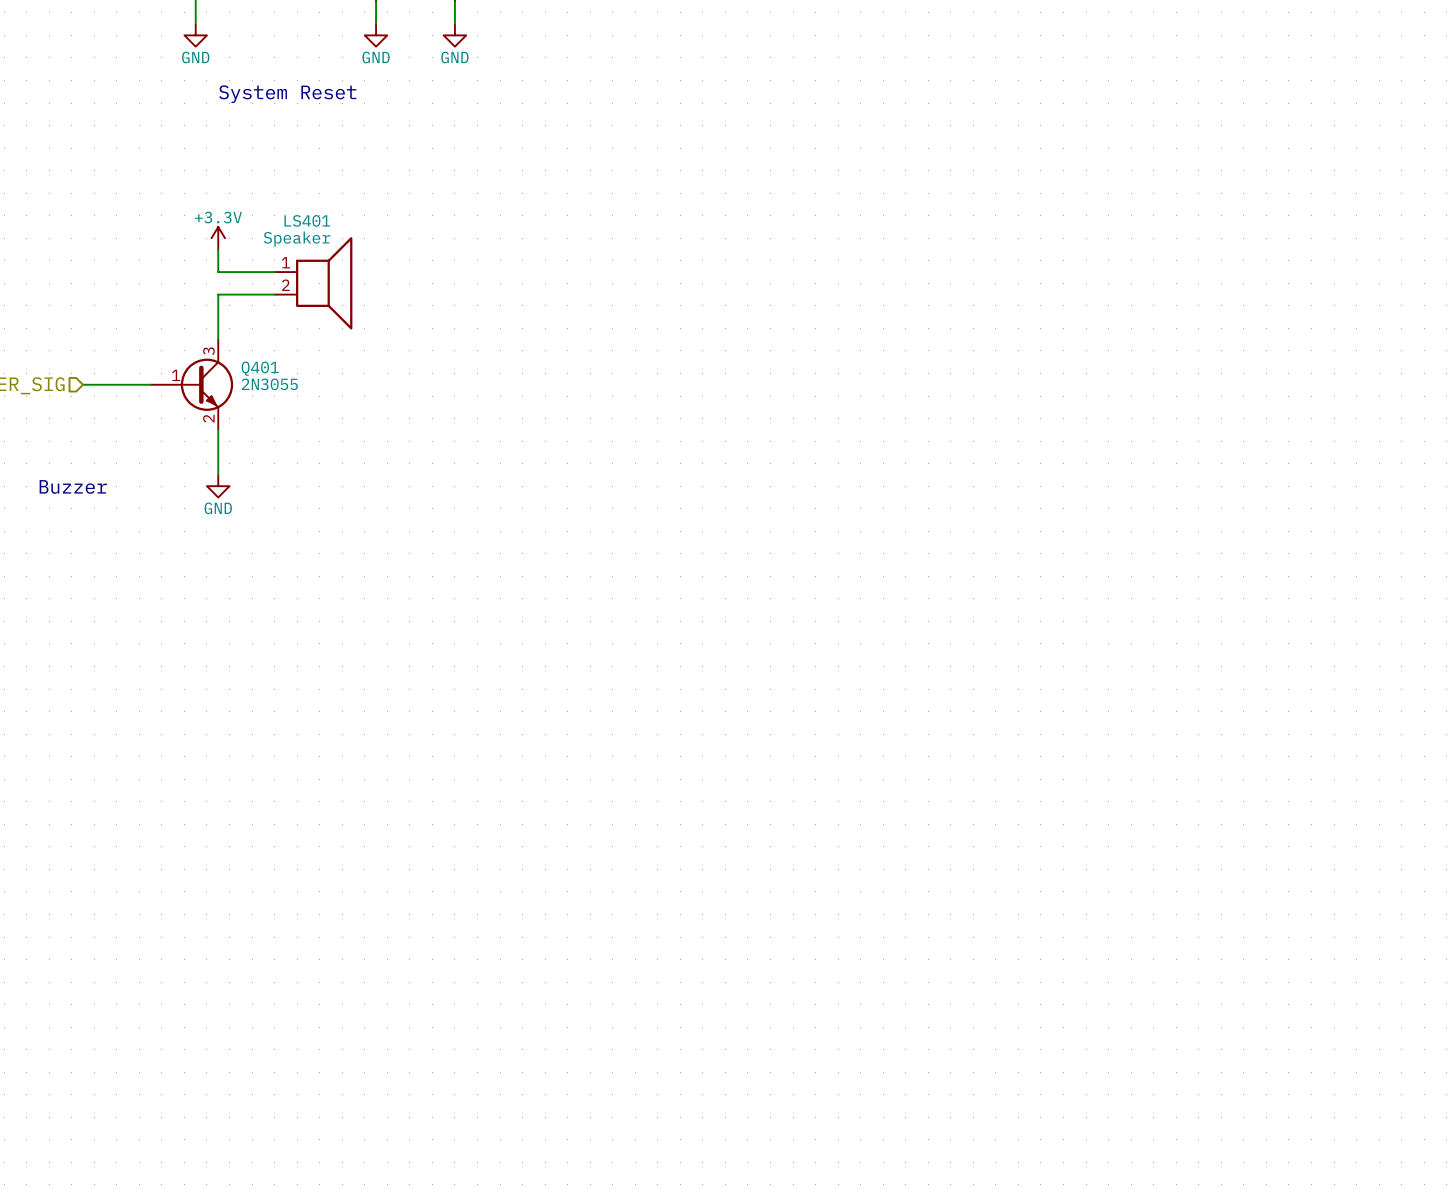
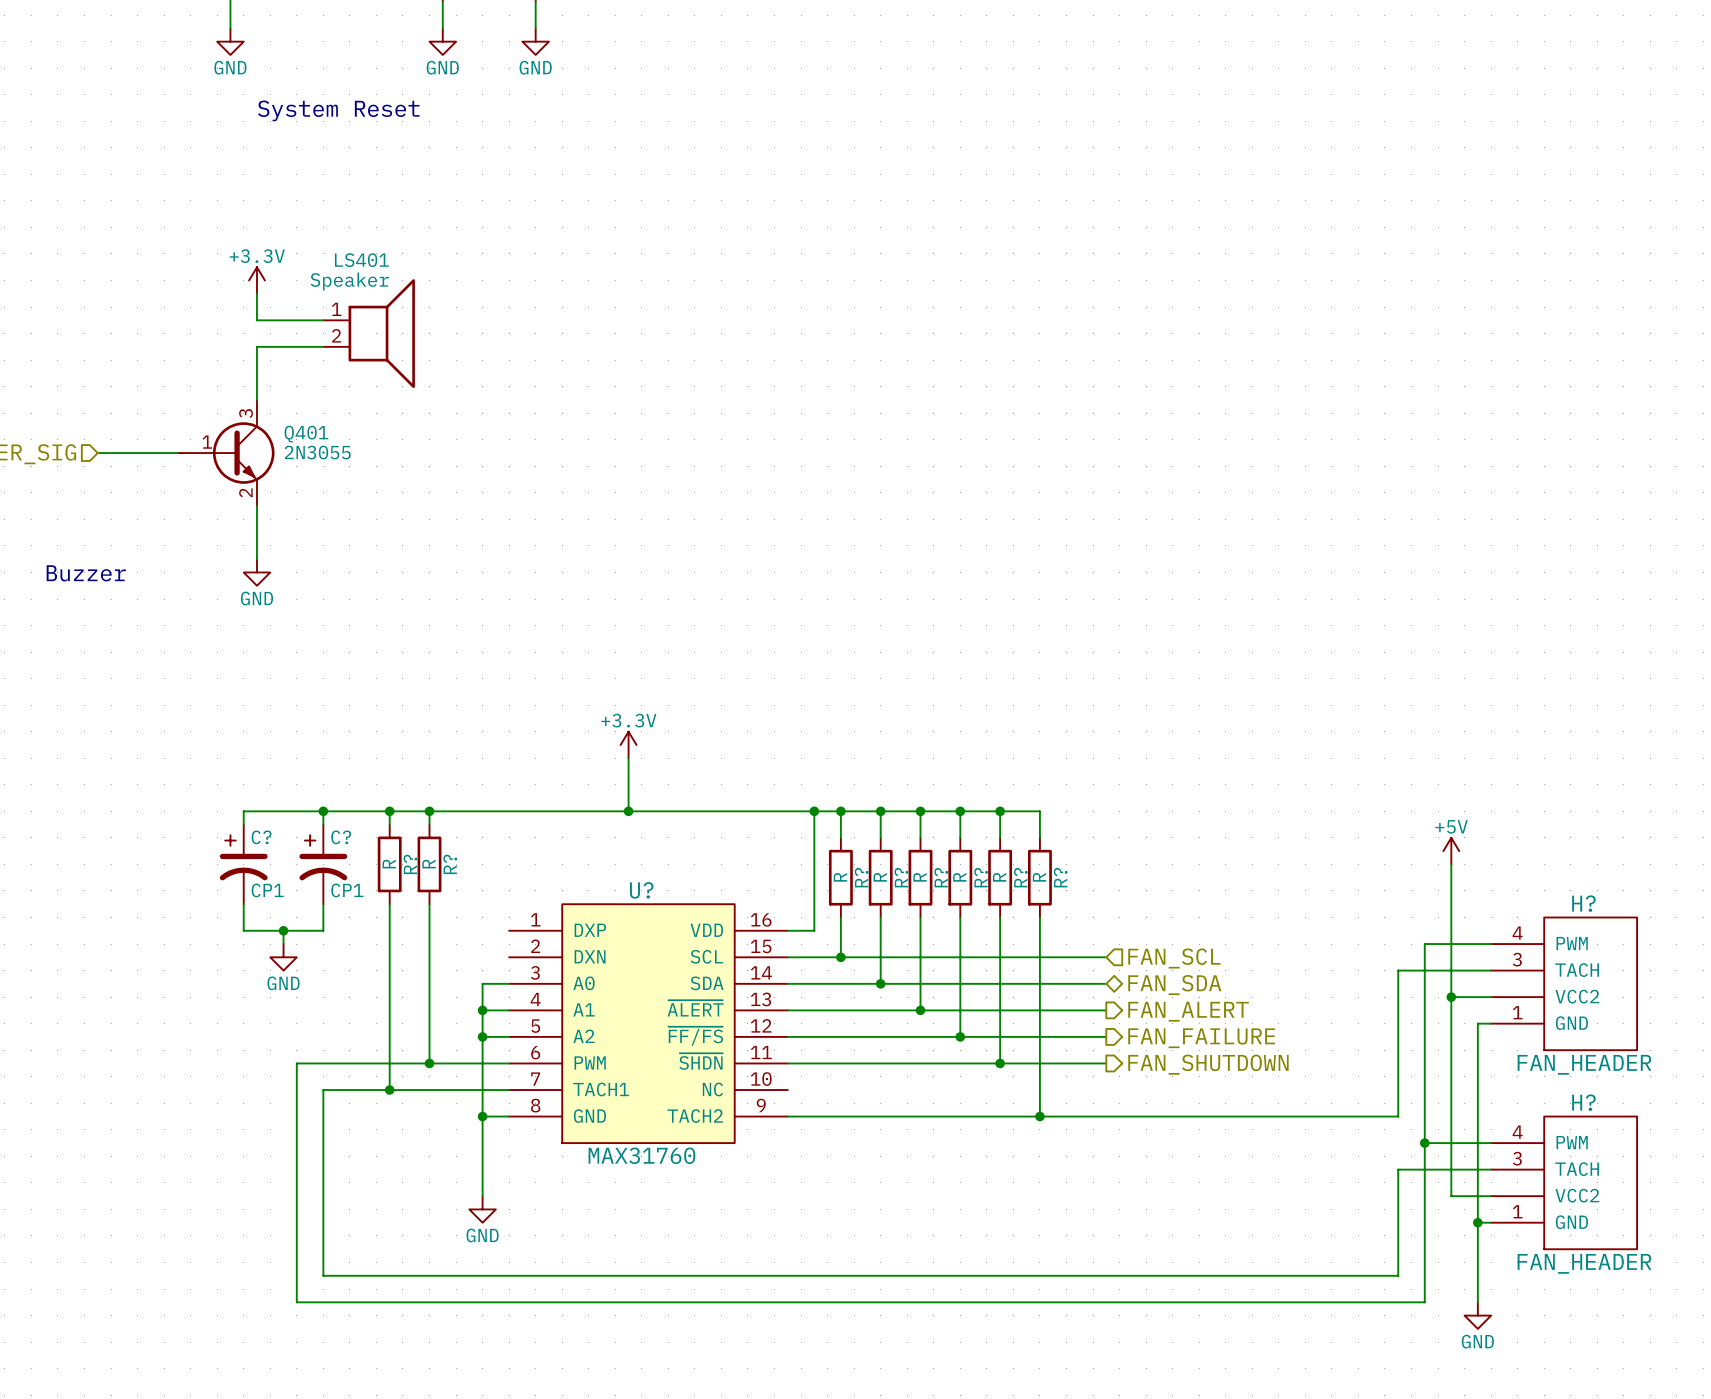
power symbol: none -> +3.3V (628, 744)
wire: none -> (628, 758) (628, 811)
wire: none -> (323, 811) (323, 824)
junction: none -> (323, 811)
wire: none -> (389, 811) (389, 824)
junction: none -> (389, 811)
wire: none -> (429, 811) (429, 824)
junction: none -> (429, 811)
junction: none -> (628, 811)
wire: none -> (814, 811) (814, 930) (787, 930)
junction: none -> (814, 811)
wire: none -> (840, 811) (840, 837)
junction: none -> (840, 811)
wire: none -> (880, 811) (880, 837)
junction: none -> (880, 811)
wire: none -> (920, 811) (920, 837)
junction: none -> (920, 811)
wire: none -> (960, 811) (960, 837)
junction: none -> (960, 811)
wire: none -> (1000, 811) (1000, 837)
junction: none -> (1000, 811)
wire: none -> (243, 824) (243, 811) (1039, 811) (1039, 837)
power symbol: none -> +5V (1451, 851)
C?: none -> CP1 (243, 864)
C?: none -> CP1 (323, 864)
R?: none -> R (389, 864)
R?: none -> R (429, 864)
wire: none -> (1451, 864) (1451, 1196) (1491, 1196)
R?: none -> R (840, 877)
R?: none -> R (880, 877)
R?: none -> R (920, 877)
R?: none -> R (960, 877)
R?: none -> R (1000, 877)
R?: none -> R (1039, 877)
wire: none -> (243, 904) (243, 930) (323, 930) (323, 904)
wire: none -> (389, 904) (389, 1090)
wire: none -> (429, 904) (429, 1063)
wire: none -> (840, 917) (840, 957)
wire: none -> (880, 917) (880, 983)
wire: none -> (920, 917) (920, 1010)
wire: none -> (960, 917) (960, 1036)
wire: none -> (1000, 917) (1000, 1063)
wire: none -> (1039, 917) (1039, 1116)
wire: none -> (283, 930) (283, 944)
junction: none -> (283, 930)
wire: none -> (1491, 944) (1424, 944) (1424, 1302) (296, 1302) (296, 1063) (509, 1063)
power symbol: none -> GND (283, 957)
wire: none -> (787, 957) (1106, 957)
junction: none -> (840, 957)
hierarchical label: none -> FAN_SCL (1174, 958)
wire: none -> (1491, 970) (1398, 970) (1398, 1116) (787, 1116)
wire: none -> (509, 983) (482, 983) (482, 1196)
wire: none -> (787, 983) (1106, 983)
junction: none -> (880, 983)
H?: none -> FAN_HEADER (1564, 983)
hierarchical label: none -> FAN_SDA (1174, 985)
wire: none -> (1451, 997) (1491, 997)
junction: none -> (1451, 997)
wire: none -> (482, 1010) (509, 1010)
junction: none -> (482, 1010)
wire: none -> (787, 1010) (1106, 1010)
junction: none -> (920, 1010)
hierarchical label: none -> FAN_ALERT (1188, 1011)
U?: none -> MAX31760 (648, 1023)
wire: none -> (1491, 1023) (1477, 1023) (1477, 1302)
wire: none -> (482, 1036) (509, 1036)
junction: none -> (482, 1036)
wire: none -> (787, 1036) (1106, 1036)
junction: none -> (960, 1036)
hierarchical label: none -> FAN_FAILURE (1201, 1038)
junction: none -> (429, 1063)
wire: none -> (787, 1063) (1106, 1063)
junction: none -> (1000, 1063)
hierarchical label: none -> FAN_SHUTDOWN (1208, 1064)
junction: none -> (389, 1090)
wire: none -> (509, 1090) (323, 1090) (323, 1275) (1398, 1275) (1398, 1169) (1491, 1169)
wire: none -> (482, 1116) (509, 1116)
junction: none -> (482, 1116)
junction: none -> (1039, 1116)
wire: none -> (1424, 1143) (1491, 1143)
junction: none -> (1424, 1143)
H?: none -> FAN_HEADER (1564, 1182)
power symbol: none -> GND (482, 1209)
wire: none -> (1477, 1222) (1491, 1222)
junction: none -> (1477, 1222)
power symbol: none -> GND (1477, 1315)

